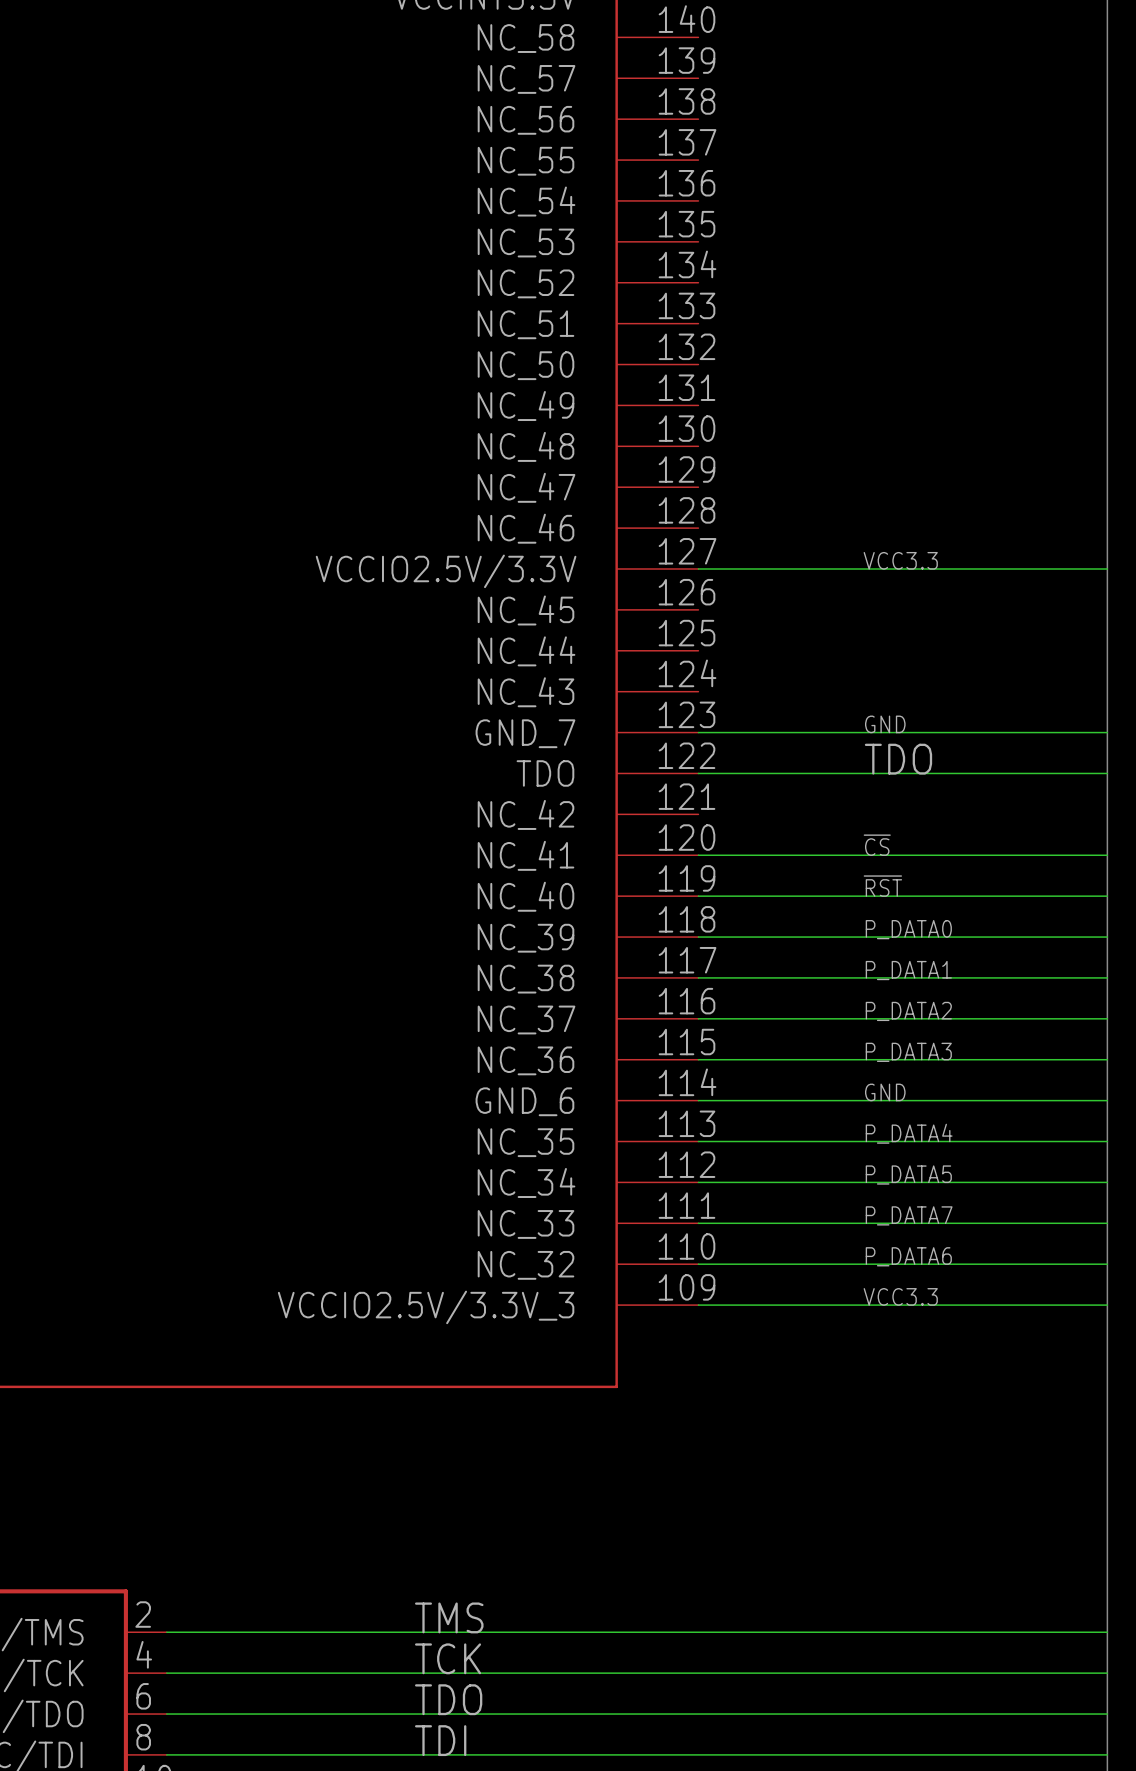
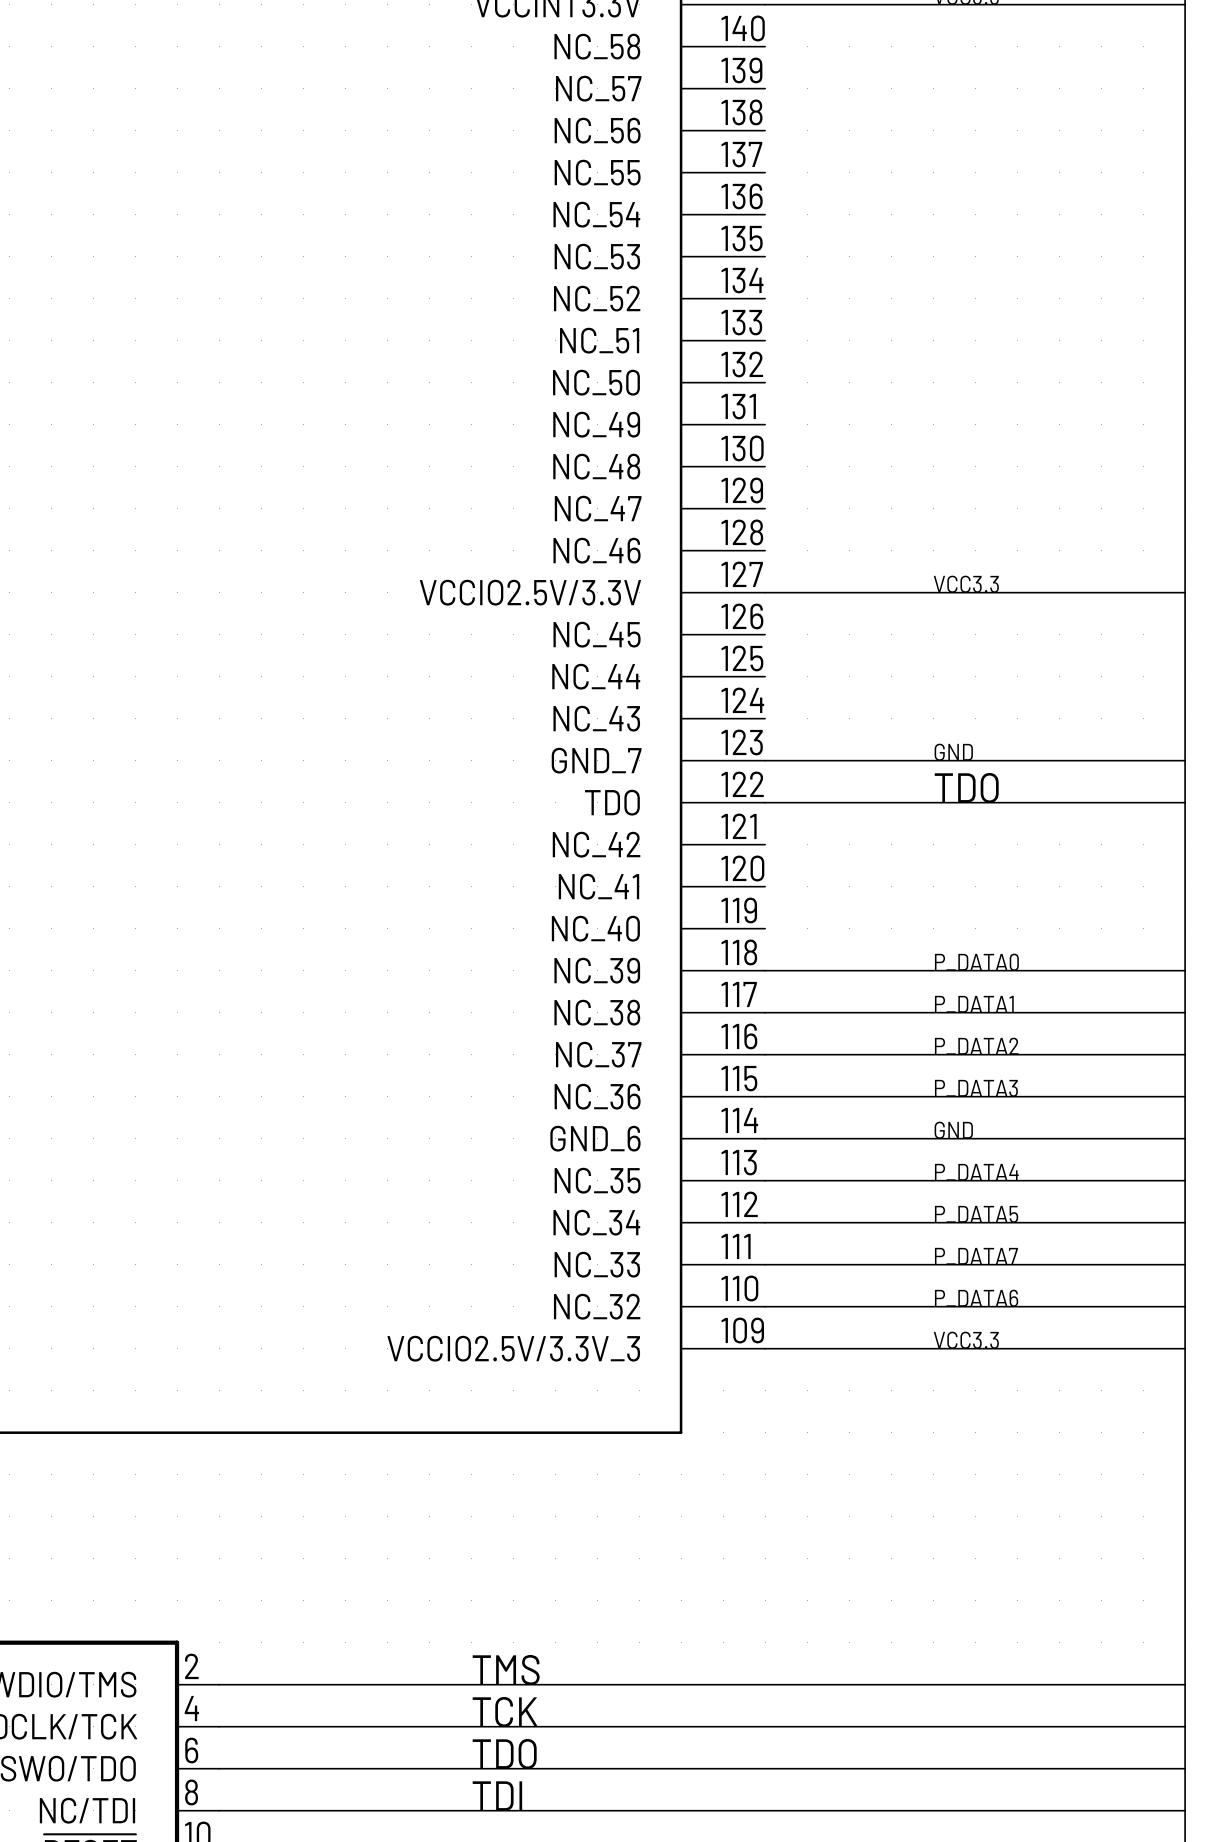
label: ~{CS} (877, 845) -> none
wire: (698, 855) (1107, 855) -> none
label: ~{RST} (882, 886) -> none
wire: (698, 896) (1107, 896) -> none

